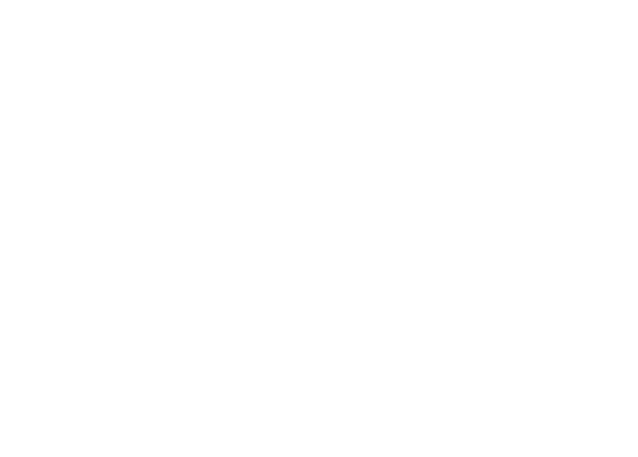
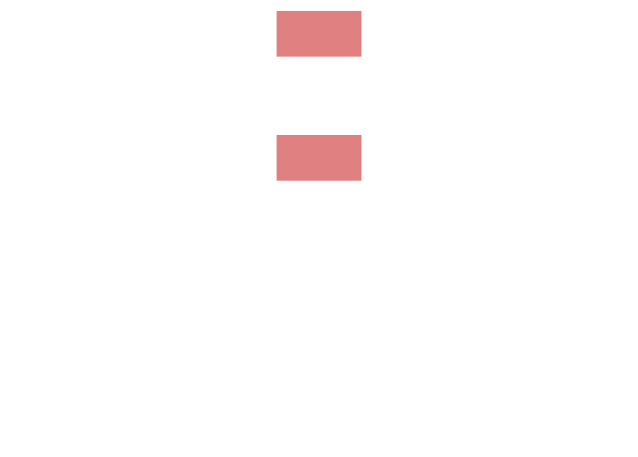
part: none -> (319, 95)

